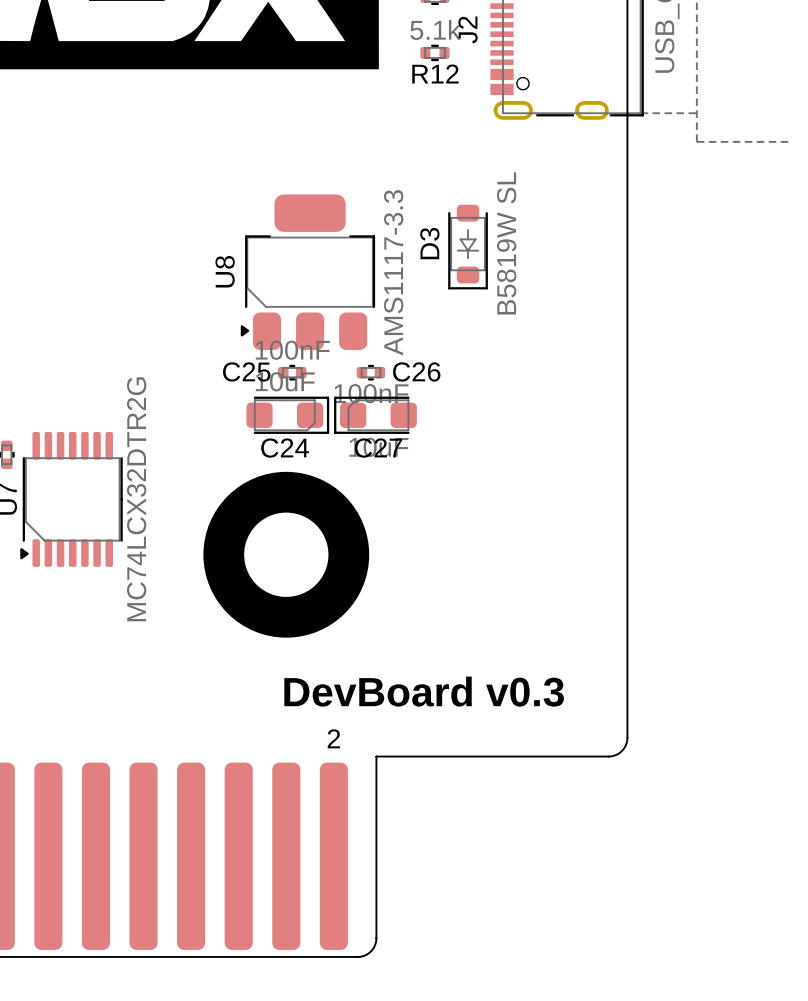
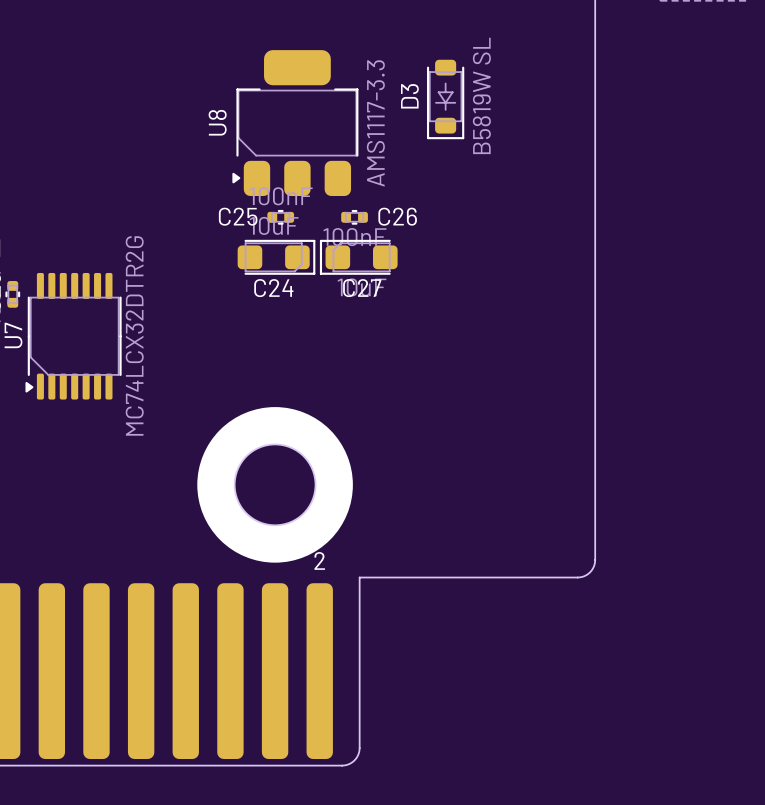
drawing position: (286, 554) -> (275, 484)
round board edge position: (286, 554) -> (275, 484)
text: DevBoard v0.3 (424, 691) -> none

